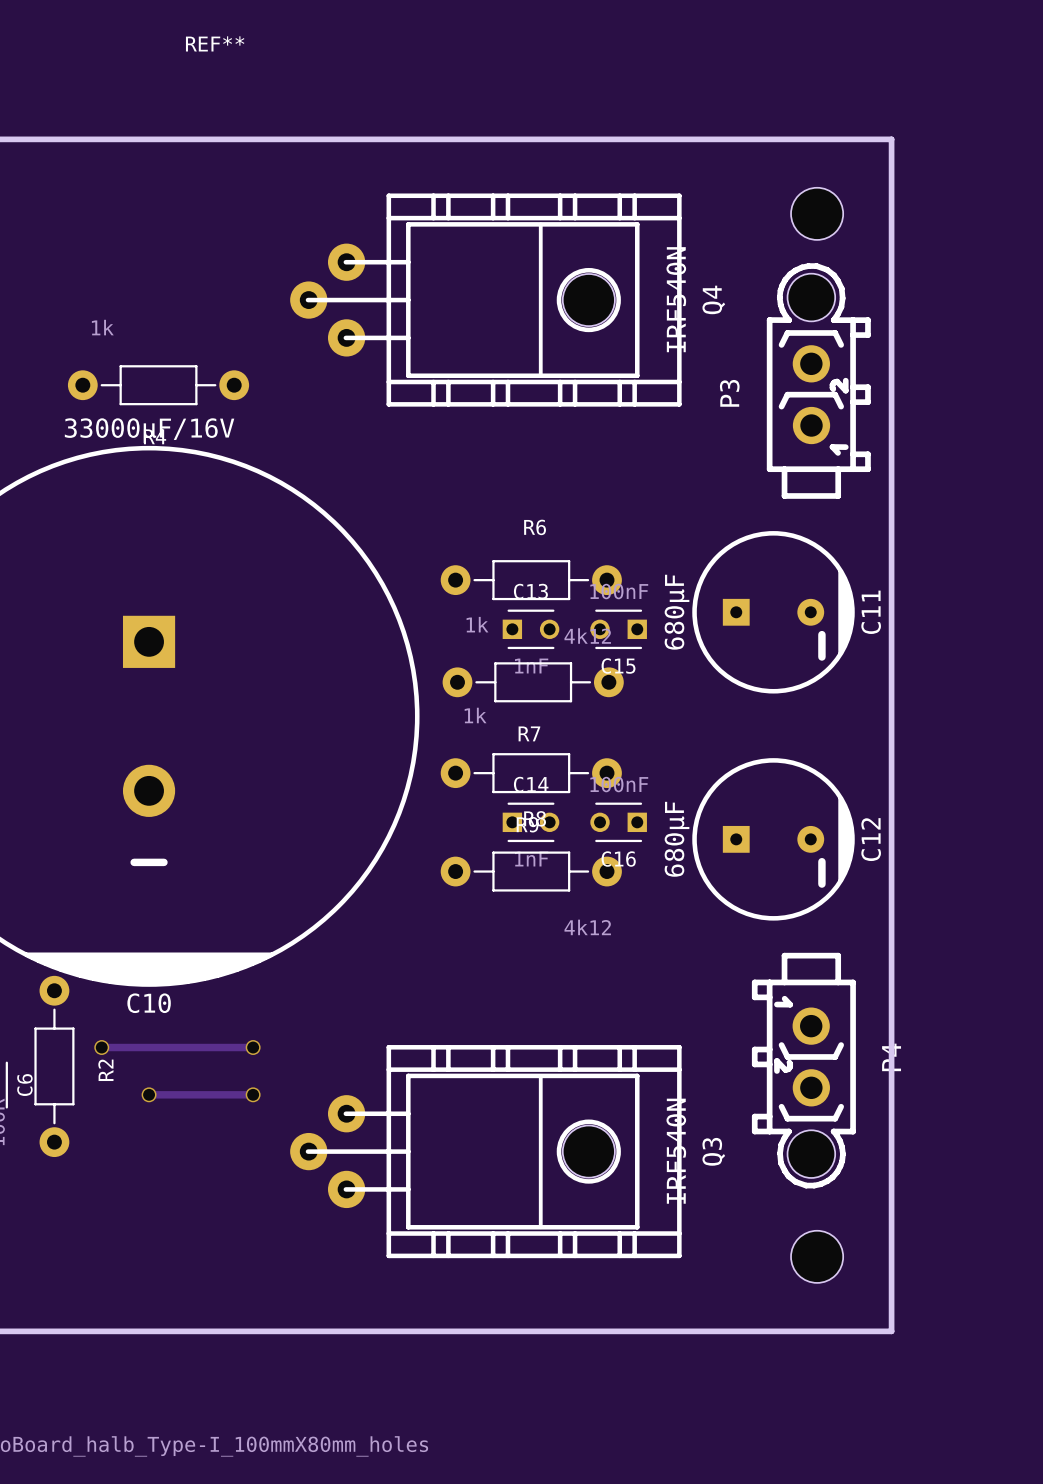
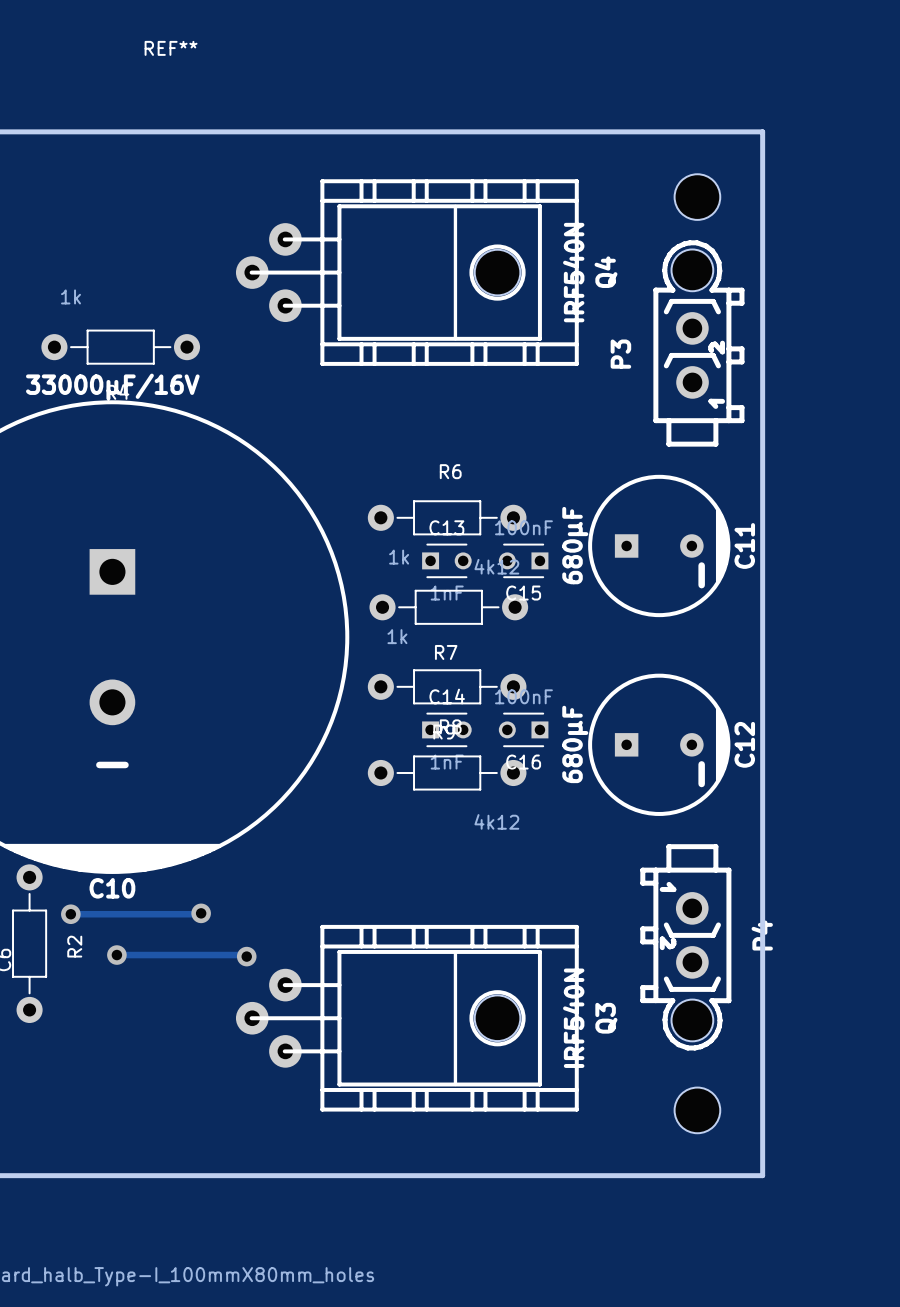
track: none -> (201, 913) (70, 914)
via: none -> (201, 913)
via size: [94, 1040, 110, 1055] -> [61, 904, 81, 925]
track: (101, 1047) (253, 1047) -> none
via: (253, 1047) -> none
track: none -> (116, 955) (245, 955) (246, 956)
via: none -> (116, 955)
via: none -> (246, 956)
track: (149, 1094) (253, 1094) -> none
via: (149, 1094) -> none
via: (253, 1094) -> none

